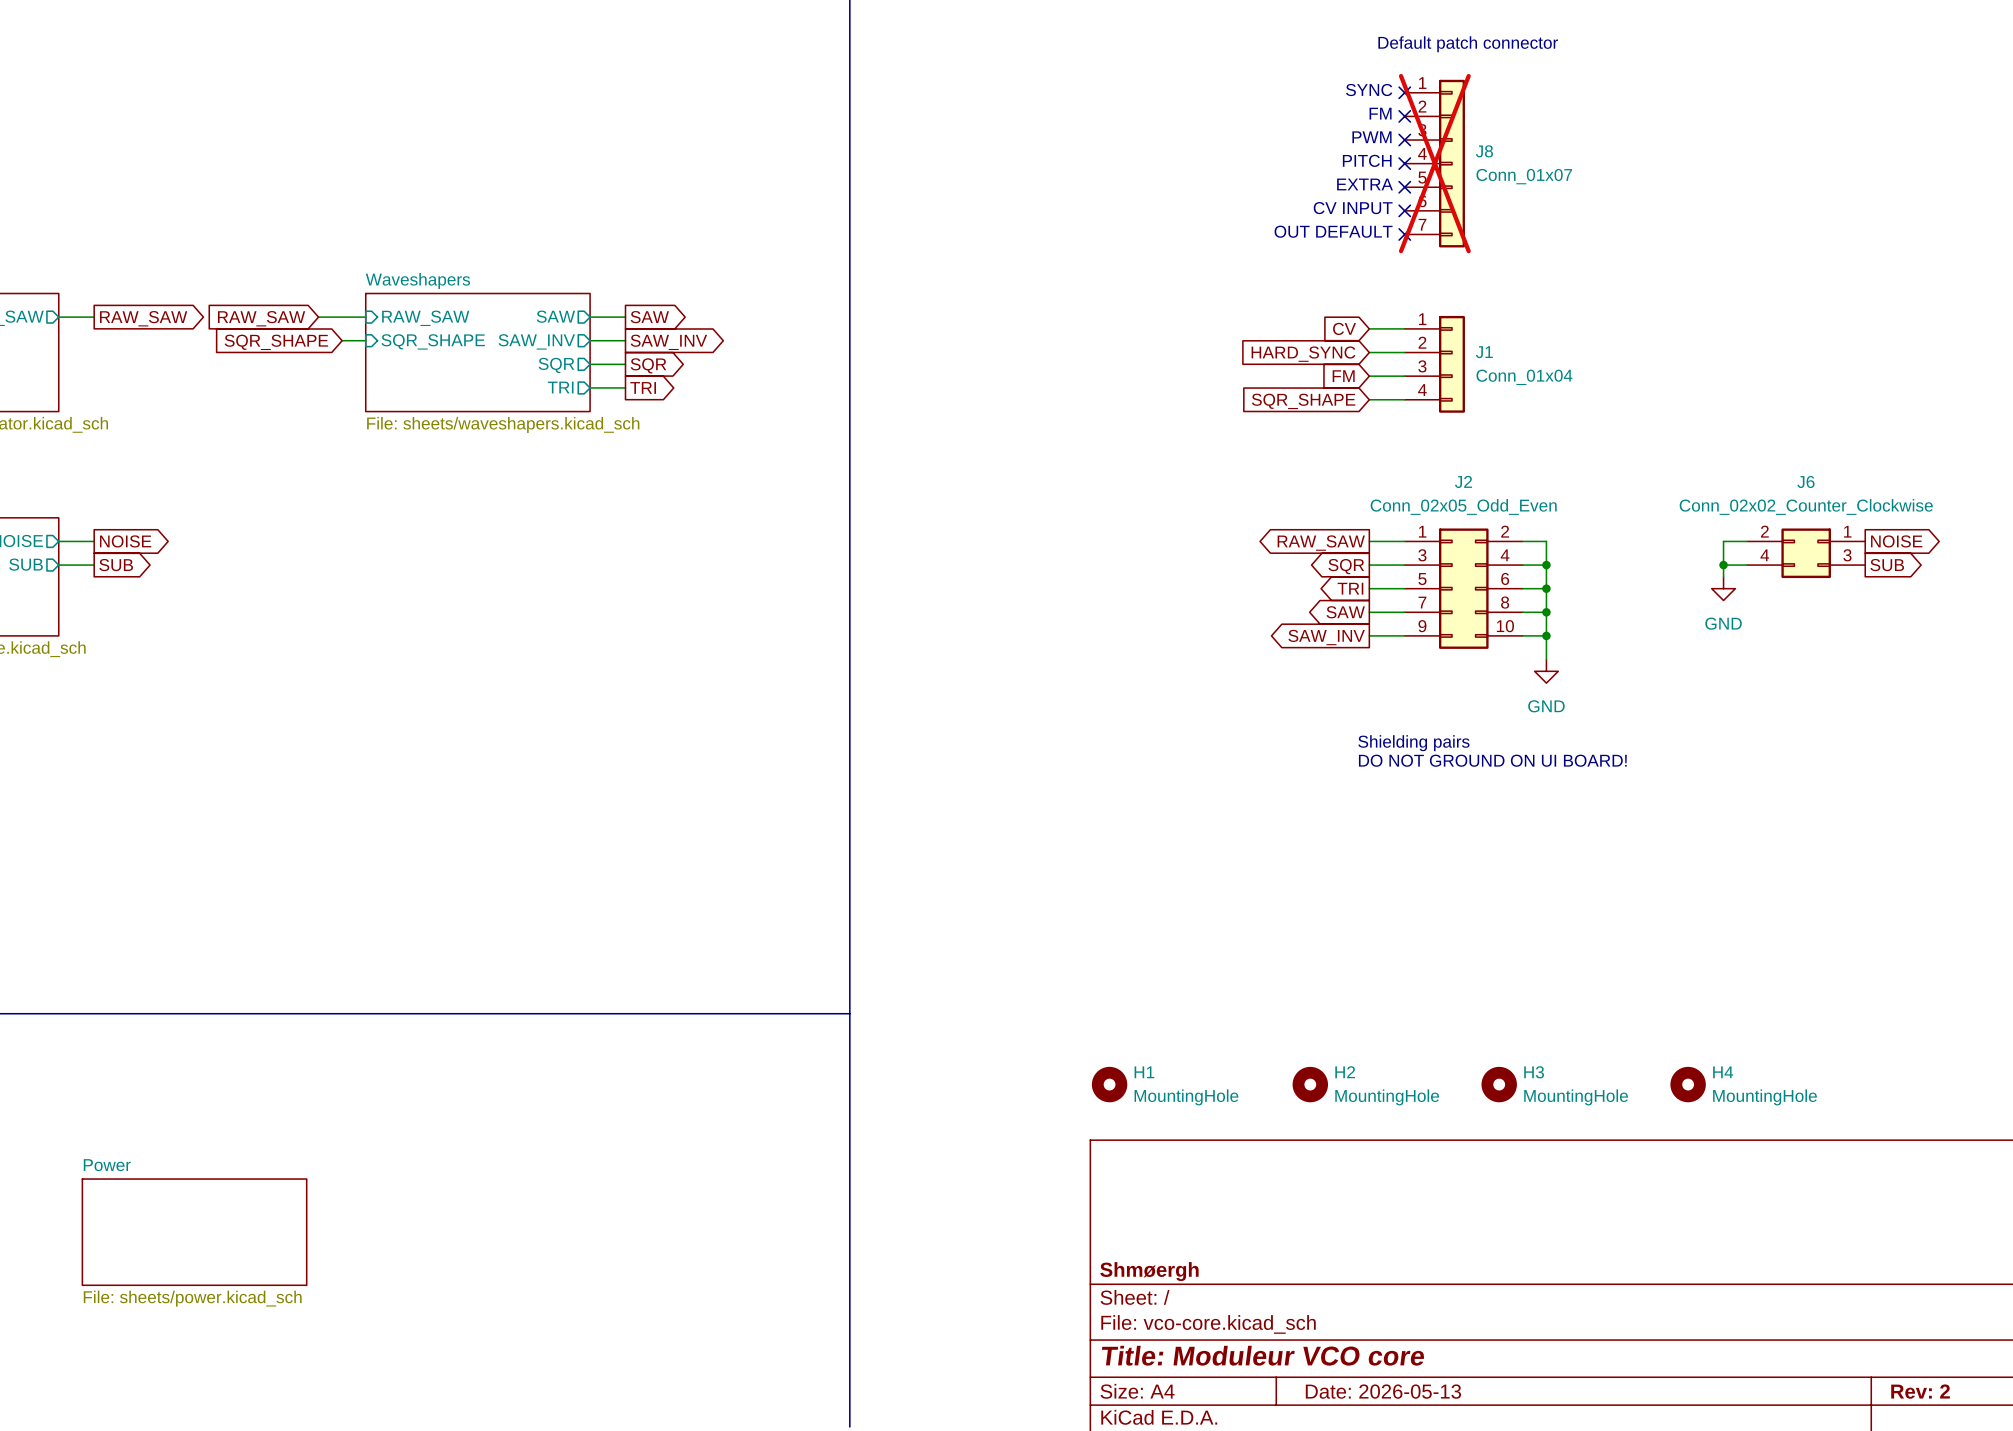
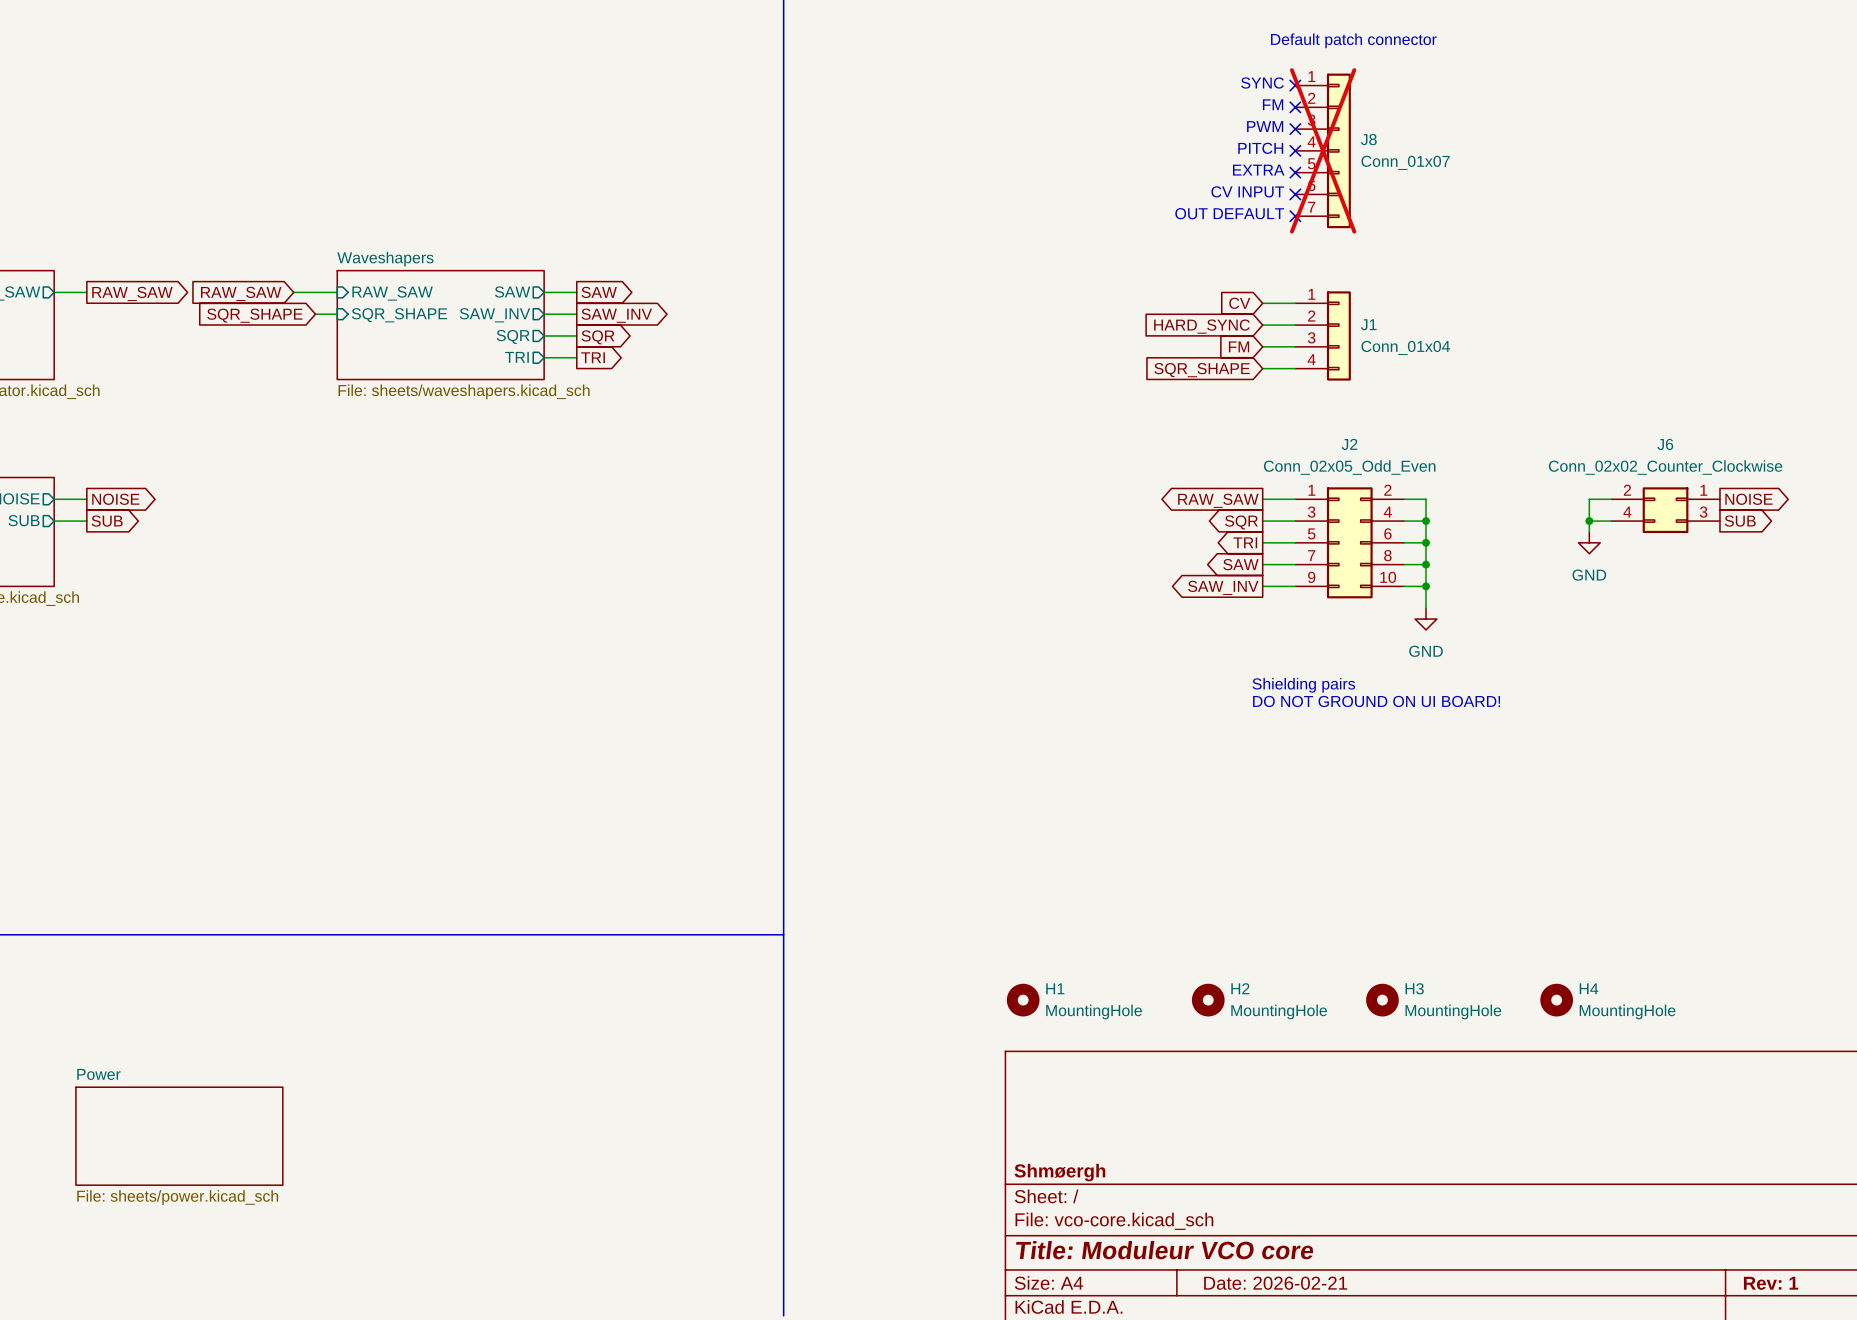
title block: Date: 2026-05-13 (1383, 1391) -> Date: 2026-02-21 (1275, 1283)
title block: Rev: 2 (1920, 1391) -> Rev: 1 (1771, 1283)

